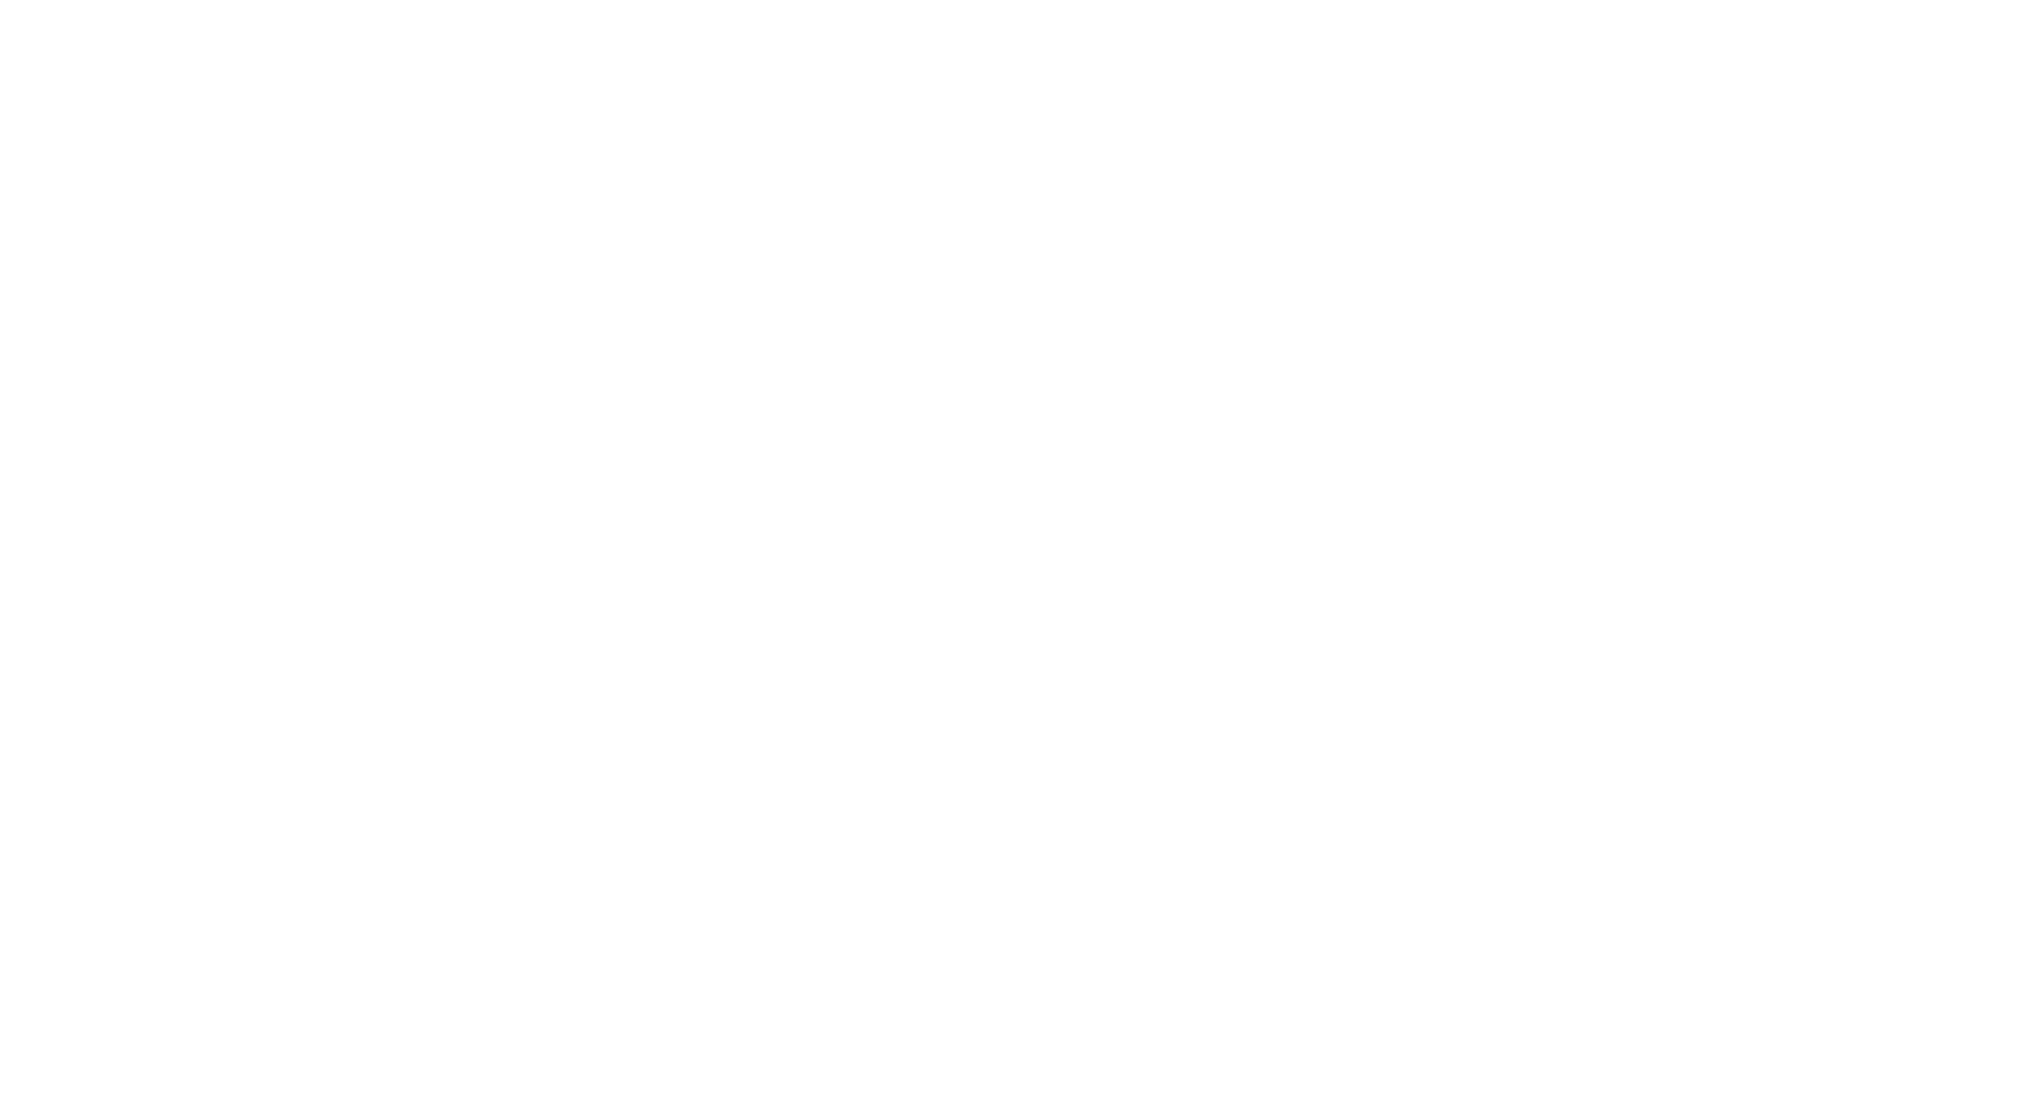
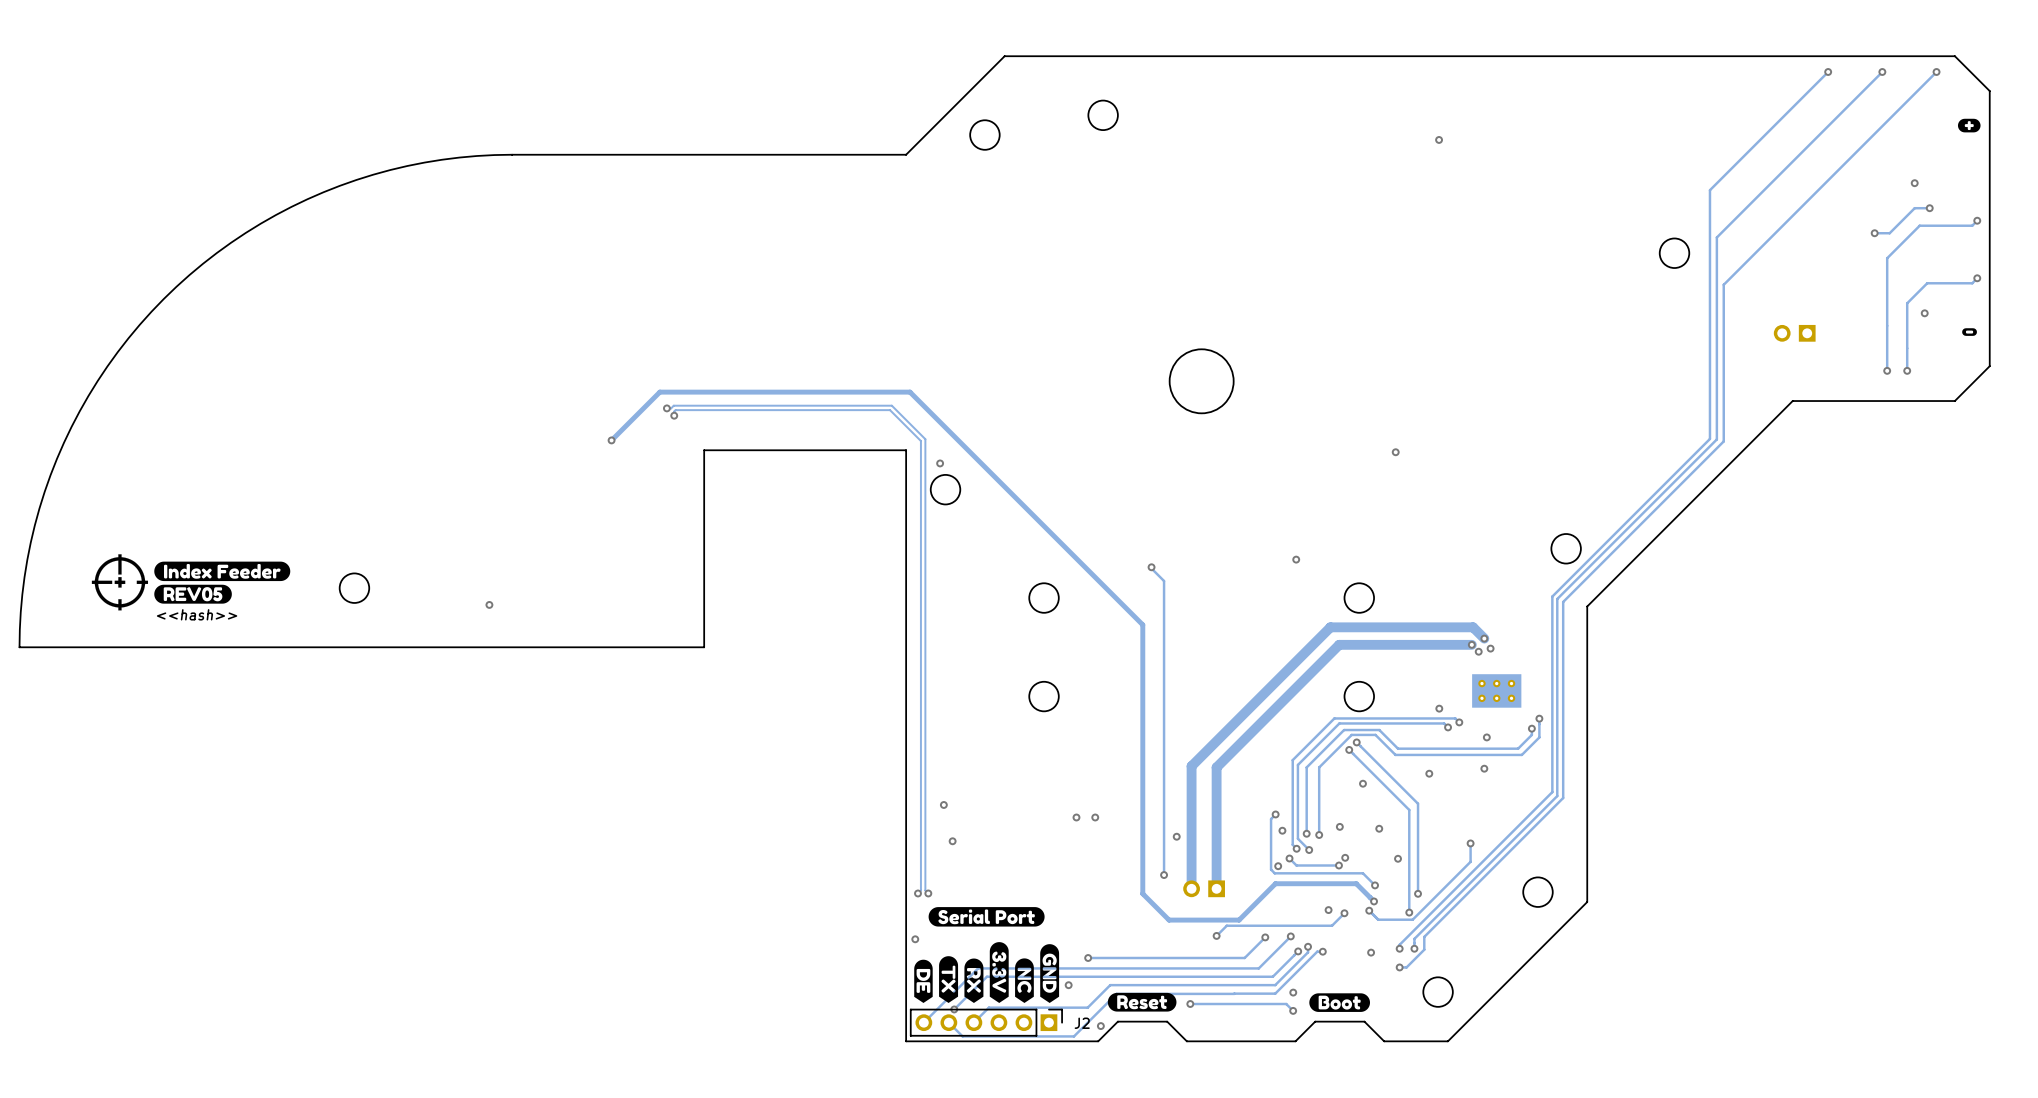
board edge: none -> (1954, 56) (1004, 56) (906, 154) (494, 155) (424, 162) (373, 174) (339, 185) (291, 206) (231, 242) (189, 275) (163, 299) (117, 352) (79, 411) (64, 442) (44, 491) (27, 559) (22, 594) (19, 647) (704, 647) (704, 450) (906, 450) (906, 1041) (1098, 1041) (1117, 1021) (1167, 1021) (1186, 1041) (1295, 1041) (1315, 1021) (1364, 1021) (1384, 1041) (1447, 1041) (1587, 902) (1587, 606) (1792, 401) (1954, 401) (1989, 366) (1989, 91) (1954, 56)
track: none -> (1828, 71) (1709, 190) (1709, 438) (1552, 596) (1552, 792) (1399, 944) (1399, 948)
via: none -> (1828, 71)
track: none -> (1882, 71) (1716, 237) (1716, 439) (1557, 599) (1557, 796) (1414, 938) (1414, 948)
via: none -> (1882, 71)
track: none -> (1936, 71) (1723, 284) (1723, 441) (1563, 601) (1563, 798) (1424, 936) (1424, 949) (1406, 967) (1399, 967)
via: none -> (1936, 71)
round board edge: none -> [1088, 100, 1119, 131]
drawing: none -> [1957, 118, 1981, 133]
round board edge: none -> [969, 120, 1000, 151]
via: none -> (1439, 139)
via: none -> (1914, 183)
track: none -> (1929, 208) (1914, 208) (1889, 233) (1874, 233)
via: none -> (1929, 208)
track: none -> (1977, 220) (1972, 225) (1919, 225) (1887, 258) (1887, 370)
via: none -> (1977, 220)
via: none -> (1874, 233)
round board edge: none -> [1659, 238, 1690, 269]
track: none -> (1977, 278) (1972, 283) (1927, 283) (1907, 303) (1907, 370)
via: none -> (1977, 278)
via: none -> (1924, 313)
drawing: none -> [1962, 328, 1977, 336]
part: none -> (1794, 333)
round board edge: none -> [1169, 349, 1234, 414]
via: none -> (1887, 370)
via: none -> (1907, 370)
track: none -> (666, 408) (671, 408) (673, 405) (891, 405) (925, 439) (925, 890) (928, 893)
via: none -> (666, 408)
track: none -> (674, 415) (675, 410) (890, 410) (920, 441) (920, 890) (917, 893)
via: none -> (674, 415)
track: none -> (611, 440) (659, 392) (910, 392) (1142, 624) (1142, 893) (1169, 920) (1239, 920) (1275, 883) (1356, 883) (1374, 901)
via: none -> (611, 440)
via: none -> (1395, 452)
via: none -> (940, 463)
round board edge: none -> [930, 474, 961, 505]
round board edge: none -> [1551, 533, 1582, 564]
drawing: none -> [91, 554, 291, 611]
via: none -> (1296, 559)
track: none -> (1151, 567) (1164, 581) (1164, 875)
via: none -> (1151, 567)
round board edge: none -> [339, 573, 370, 604]
round board edge: none -> [1029, 583, 1060, 614]
round board edge: none -> [1344, 583, 1375, 614]
via: none -> (489, 604)
text: none -> <<hash>> (197, 614)
track: none -> (1484, 638) (1473, 627) (1330, 627) (1191, 766) (1191, 888)
via: none -> (1484, 638)
track: none -> (1471, 644) (1339, 644) (1216, 767) (1216, 888)
via: none -> (1471, 644)
via: none -> (1490, 648)
via: none -> (1478, 651)
round board edge: none -> [1029, 681, 1060, 712]
round board edge: none -> [1344, 681, 1375, 712]
part: none -> (1496, 690)
via: none -> (1439, 708)
track: none -> (1539, 718) (1539, 737) (1521, 754) (1395, 754) (1375, 734) (1351, 734) (1319, 767) (1319, 835)
via: none -> (1539, 718)
track: none -> (1459, 722) (1455, 718) (1334, 718) (1292, 760) (1292, 844) (1296, 848)
via: none -> (1459, 722)
track: none -> (1448, 727) (1444, 723) (1339, 723) (1297, 764) (1297, 838) (1309, 850)
via: none -> (1448, 727)
track: none -> (1531, 728) (1531, 734) (1518, 748) (1398, 748) (1379, 730) (1344, 730) (1306, 767) (1306, 833)
via: none -> (1531, 728)
via: none -> (1486, 737)
track: none -> (1356, 742) (1418, 803) (1418, 893)
via: none -> (1356, 742)
track: none -> (1349, 749) (1409, 809) (1409, 912)
via: none -> (1349, 749)
via: none -> (1484, 768)
via: none -> (1429, 773)
via: none -> (1362, 783)
via: none -> (943, 804)
track: none -> (1275, 814) (1271, 819) (1271, 869) (1274, 873) (1362, 873) (1375, 885)
via: none -> (1275, 814)
via: none -> (1076, 817)
via: none -> (1095, 817)
via: none -> (1339, 826)
via: none -> (1379, 828)
via: none -> (1282, 830)
via: none -> (1306, 833)
via: none -> (1319, 835)
via: none -> (1176, 836)
via: none -> (952, 841)
track: none -> (1470, 843) (1470, 861) (1412, 919) (1378, 919) (1369, 910)
via: none -> (1470, 843)
via: none -> (1296, 848)
via: none -> (1309, 850)
via: none -> (1345, 857)
track: none -> (1289, 858) (1296, 865) (1338, 865)
via: none -> (1289, 858)
via: none -> (1398, 858)
via: none -> (1338, 865)
via: none -> (1278, 866)
via: none -> (1164, 875)
round board edge: none -> [1522, 877, 1554, 908]
via: none -> (1375, 885)
part: none -> (1204, 888)
via: none -> (917, 893)
via: none -> (928, 893)
via: none -> (1418, 893)
via: none -> (1374, 901)
drawing: none -> [928, 907, 1045, 927]
via: none -> (1328, 910)
via: none -> (1369, 910)
via: none -> (1409, 912)
track: none -> (1344, 913) (1332, 925) (1226, 925) (1216, 935)
via: none -> (1344, 913)
via: none -> (1216, 935)
track: none -> (1290, 936) (1258, 968) (978, 968) (923, 1022)
via: none -> (1290, 936)
track: none -> (1265, 937) (1244, 958) (1088, 958)
via: none -> (1265, 937)
via: none -> (915, 939)
drawing: none -> [914, 942, 1060, 1003]
track: none -> (1308, 946) (1308, 952) (1275, 985) (1110, 985) (1087, 1007) (988, 1007) (973, 1022)
via: none -> (1308, 946)
via: none -> (1399, 948)
via: none -> (1414, 948)
track: none -> (1298, 951) (1272, 976) (986, 976) (954, 1009)
via: none -> (1298, 951)
track: none -> (1322, 951) (1317, 951) (1275, 993) (1116, 993) (1073, 1036) (962, 1036) (948, 1022)
via: none -> (1322, 951)
via: none -> (1371, 952)
via: none -> (1088, 958)
via: none -> (1399, 967)
round board edge: none -> [1423, 977, 1454, 1008]
via: none -> (1068, 985)
drawing: none -> [1107, 992, 1177, 1012]
via: none -> (1293, 992)
drawing: none -> [1309, 993, 1371, 1012]
track: none -> (1190, 1004) (1286, 1004) (1293, 1010)
via: none -> (1190, 1004)
via: none -> (954, 1009)
via: none -> (1293, 1010)
J2: none -> (986, 1022)
via: none -> (1100, 1026)

